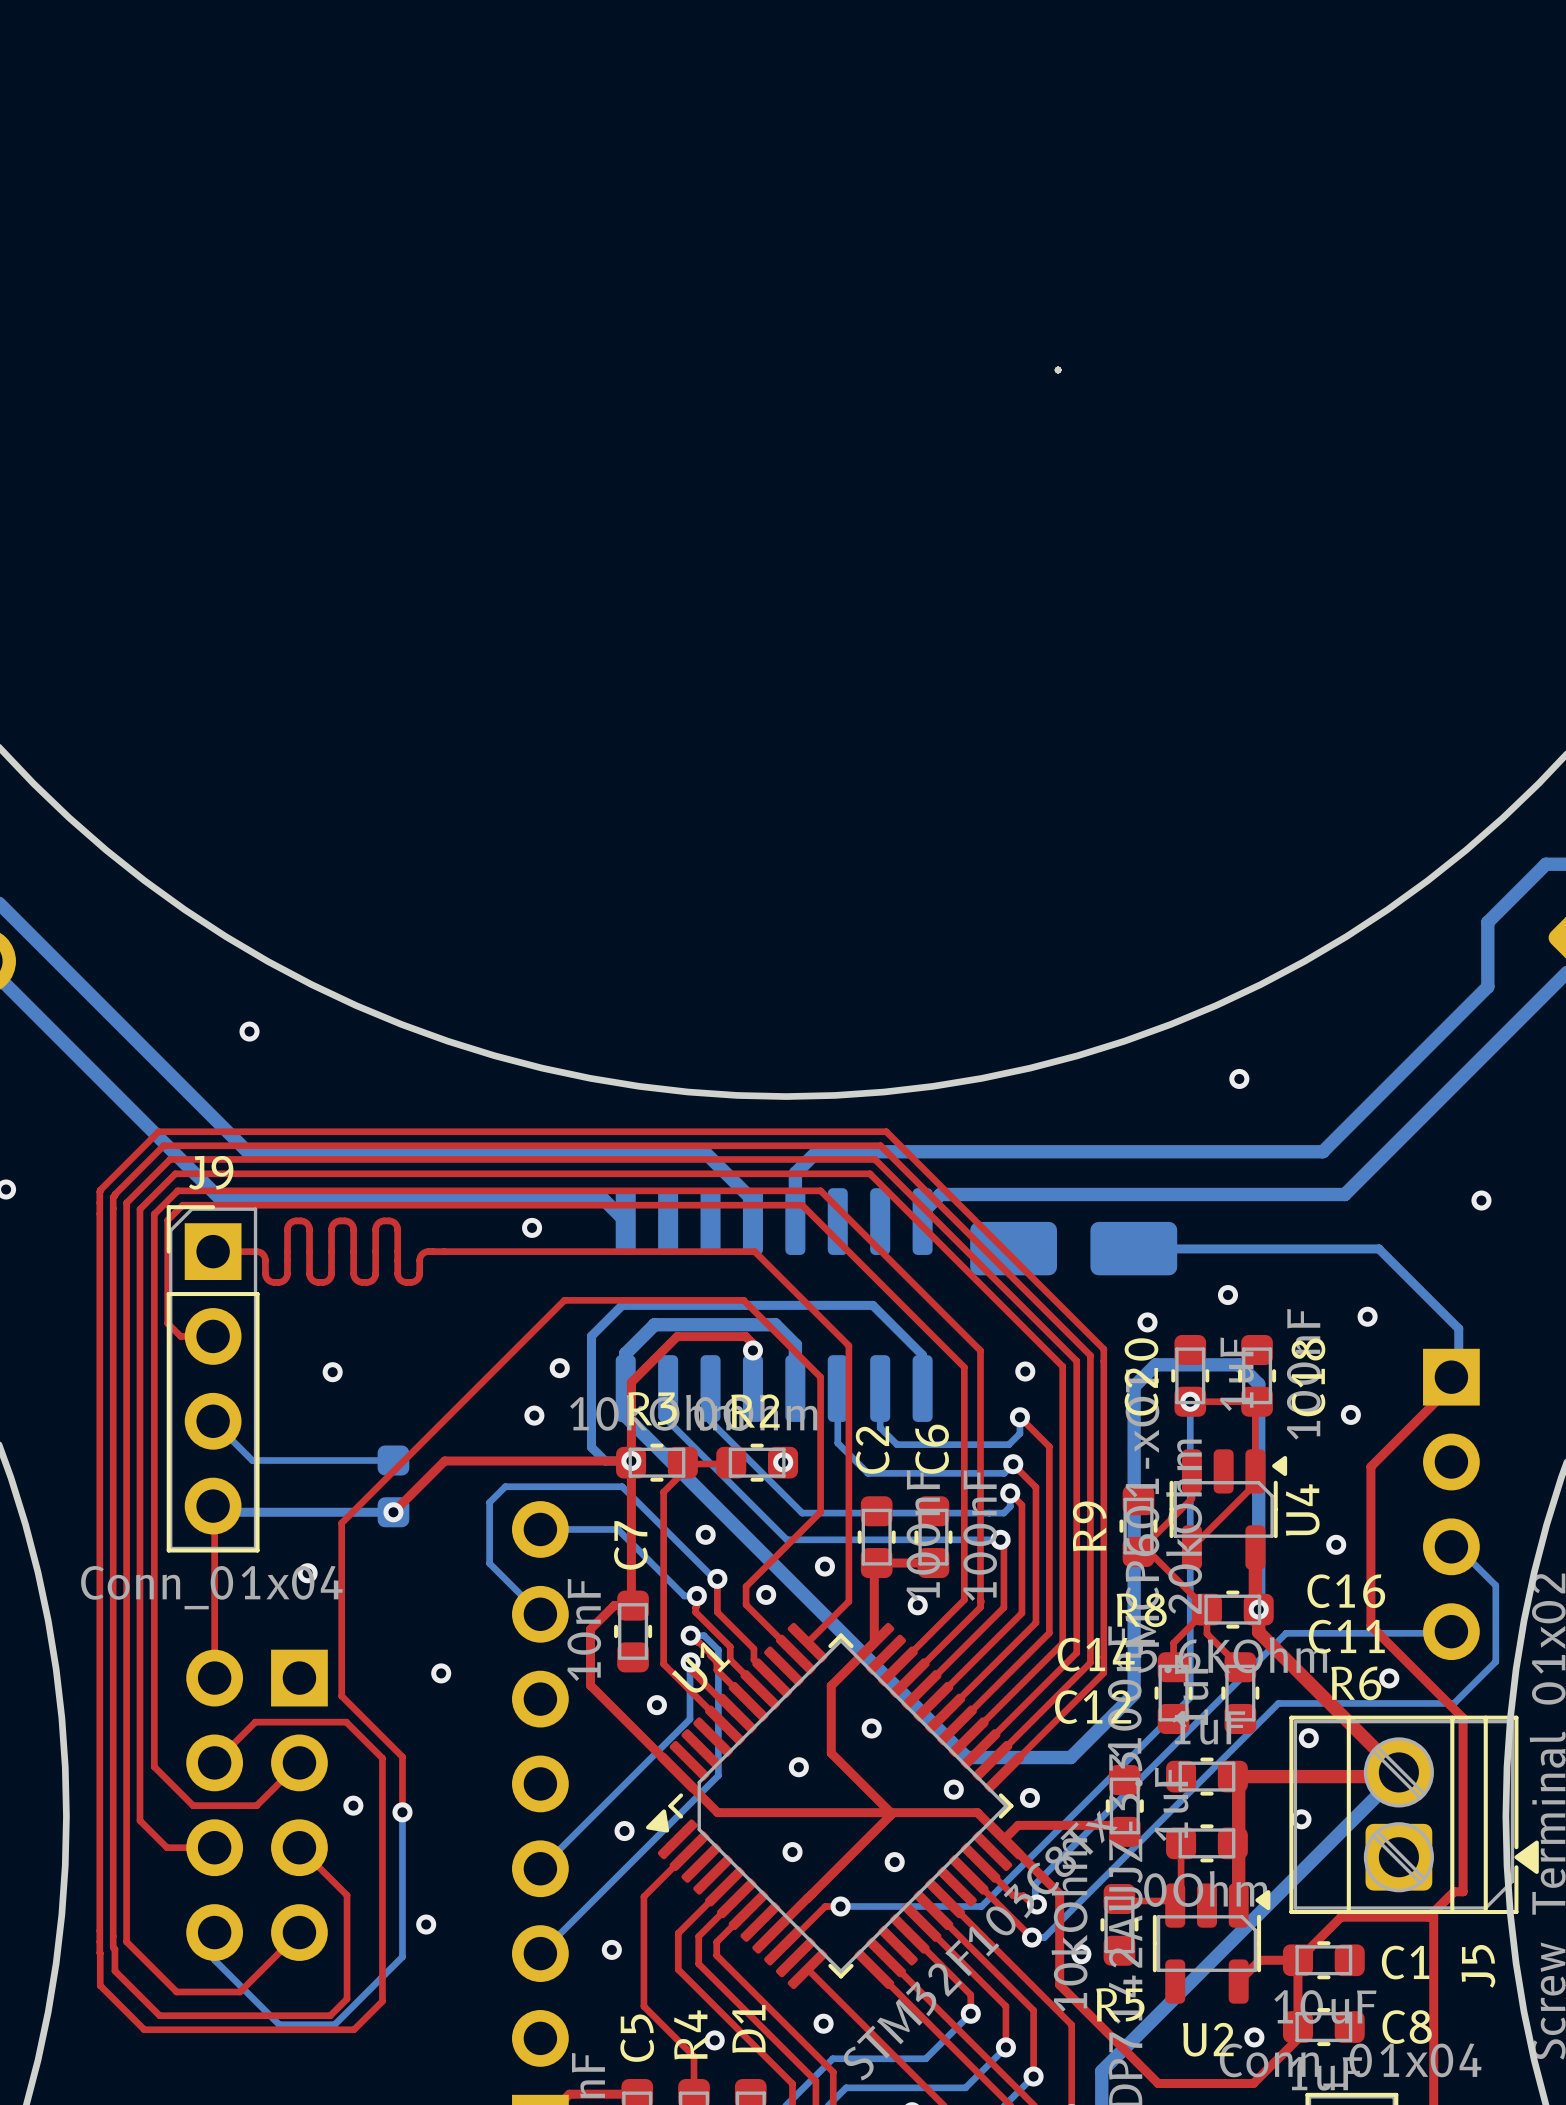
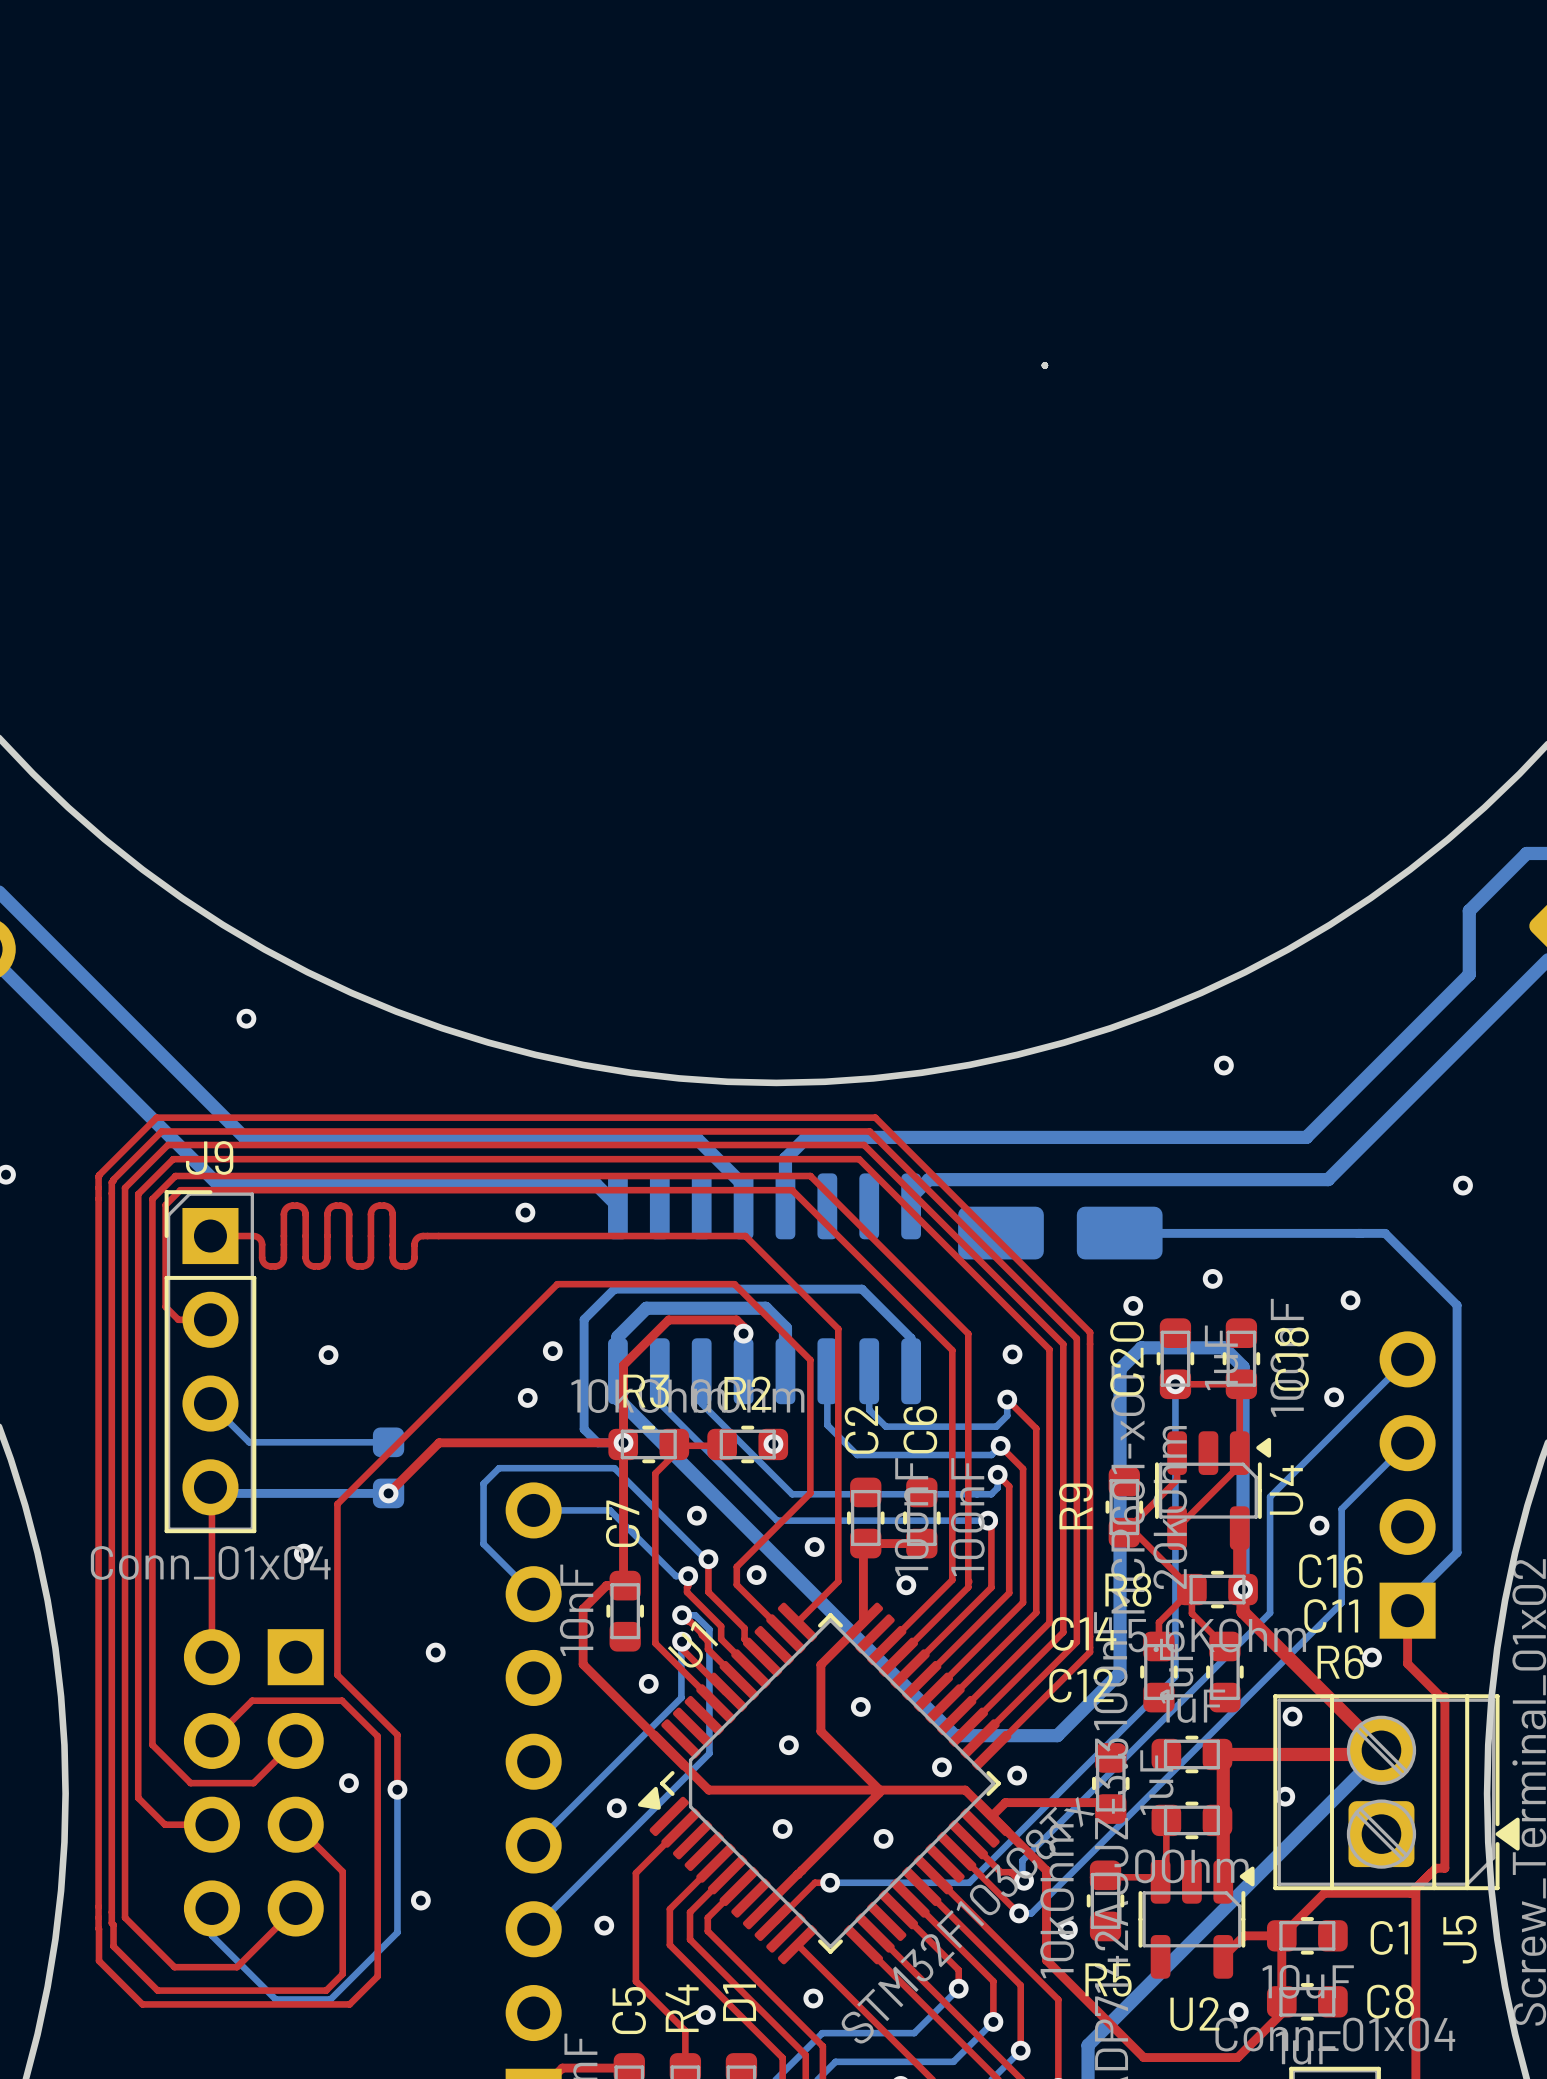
bottom track: (1378, 1248) (1458, 1328) (1458, 1378) -> (1361, 1233) (1385, 1233) (1457, 1305) (1457, 1552) (1407, 1602) (1407, 1610)
top track: (1458, 1378) (1370, 1466) (1370, 1625) (1463, 1718) -> none
part rotation: 0° (1451, 1504) -> 180° (1407, 1485)
bottom track: (1458, 1548) (1495, 1585) (1495, 1661) (1454, 1703) (1278, 1703) -> (1407, 1443) (1341, 1509) (1341, 1603) (1262, 1682)
top track: none -> (1407, 1610) (1407, 1663) (1444, 1701)
bottom track: (1286, 1633) (1458, 1633) -> (1270, 1612) (1270, 1496) (1407, 1359)

